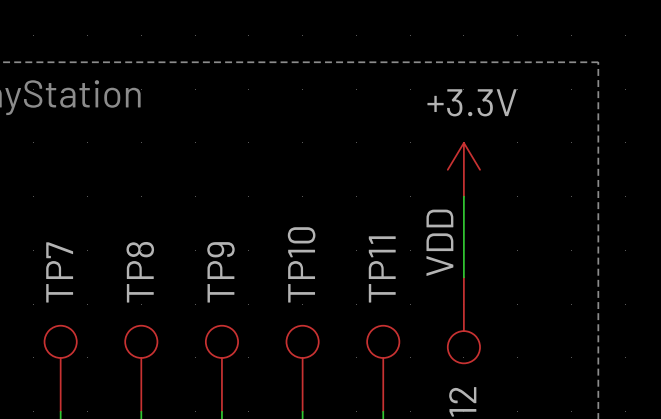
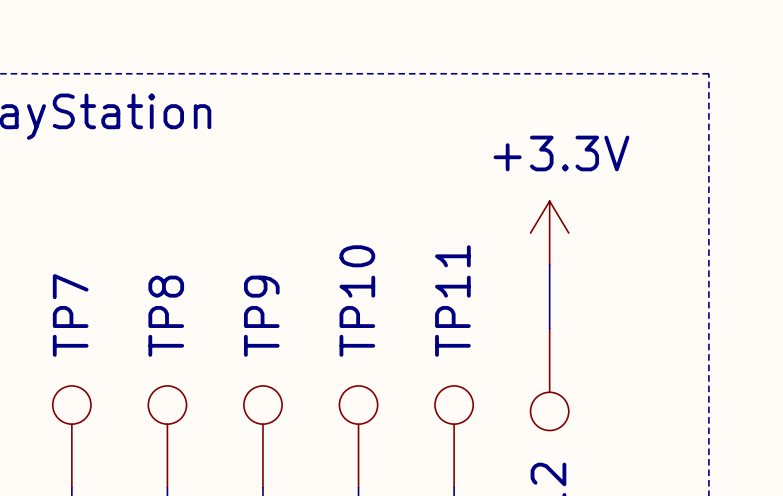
power symbol position: +3.3V (463, 169) -> +3.3V (549, 233)
label: VDD (439, 242) -> none

